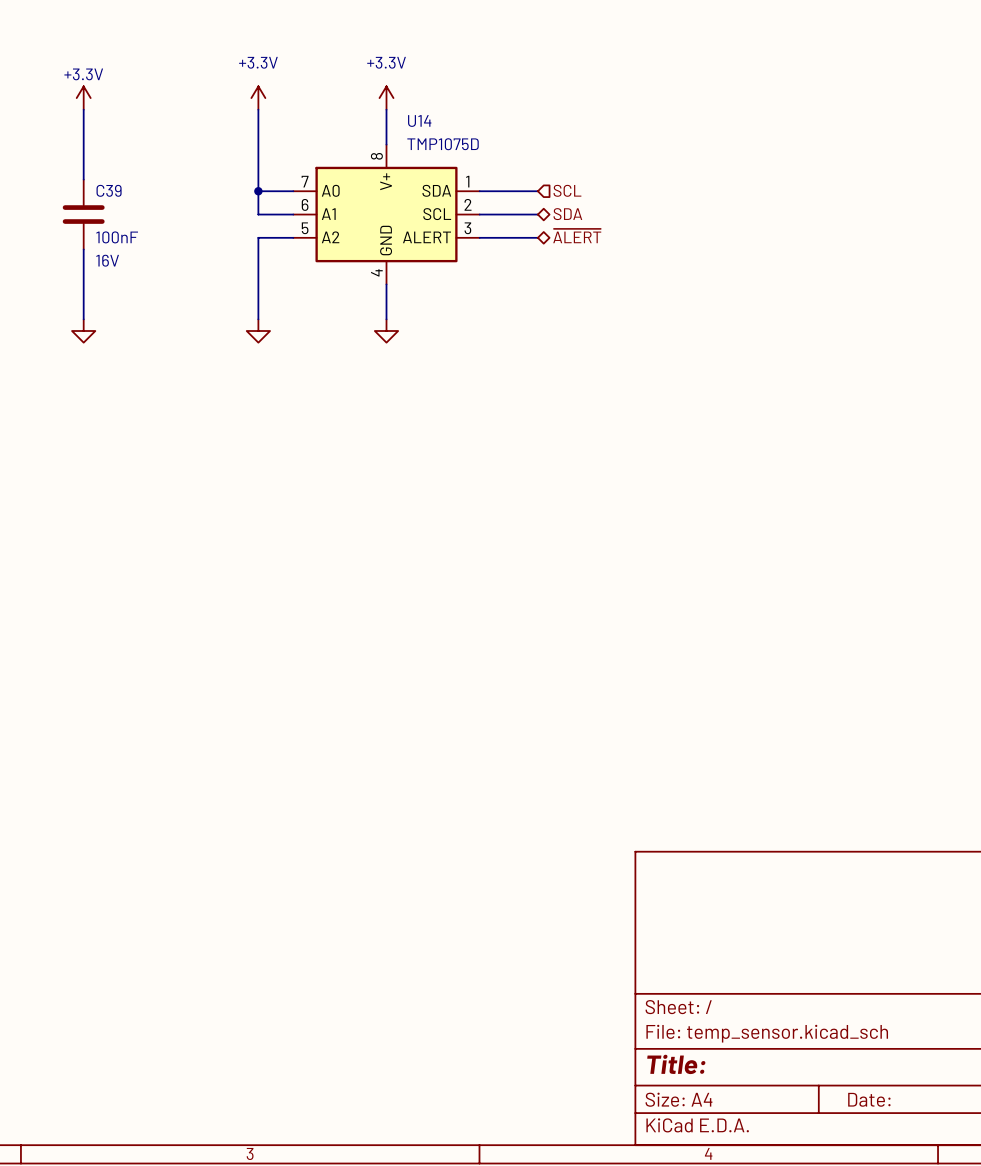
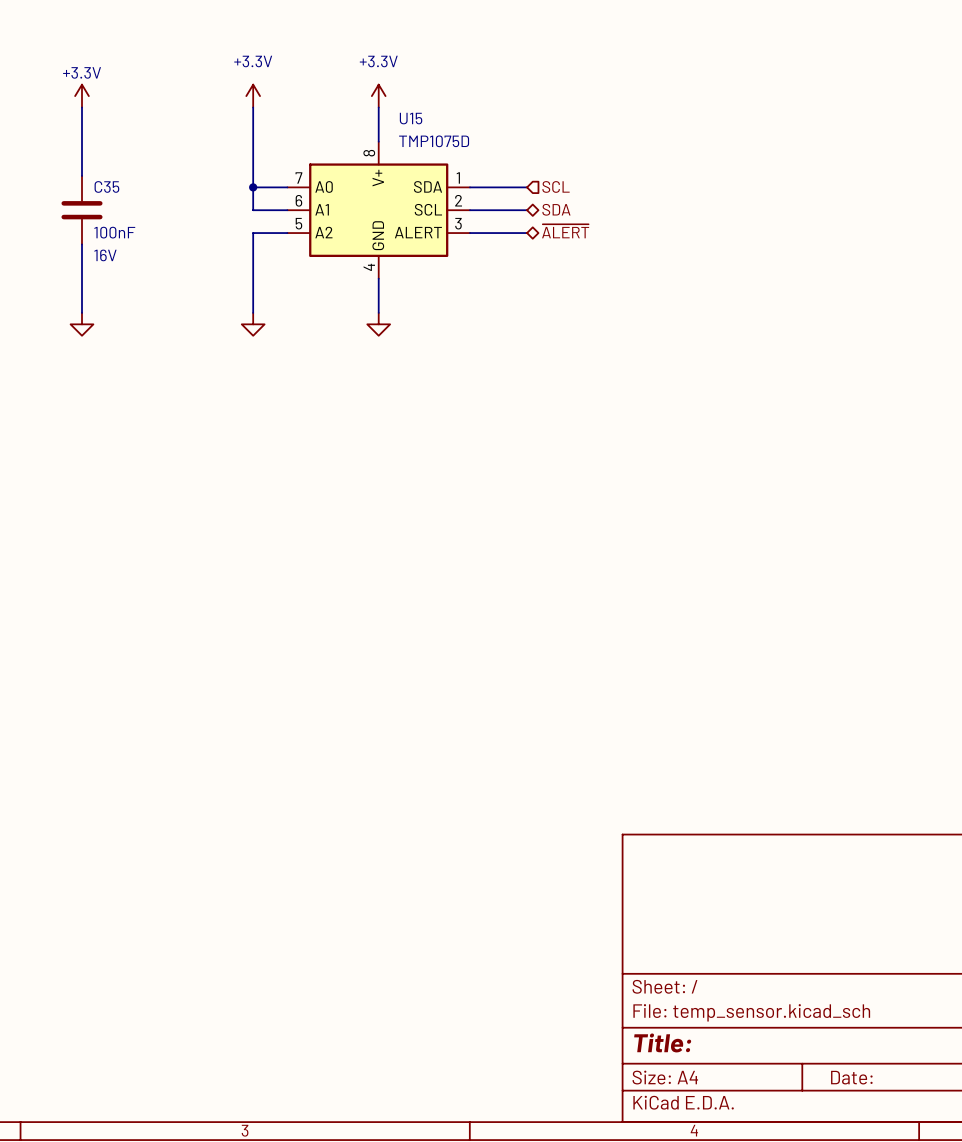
U14 name: U14 (419, 120) -> U15 (411, 118)
C39 name: C39 (109, 190) -> C35 (106, 186)

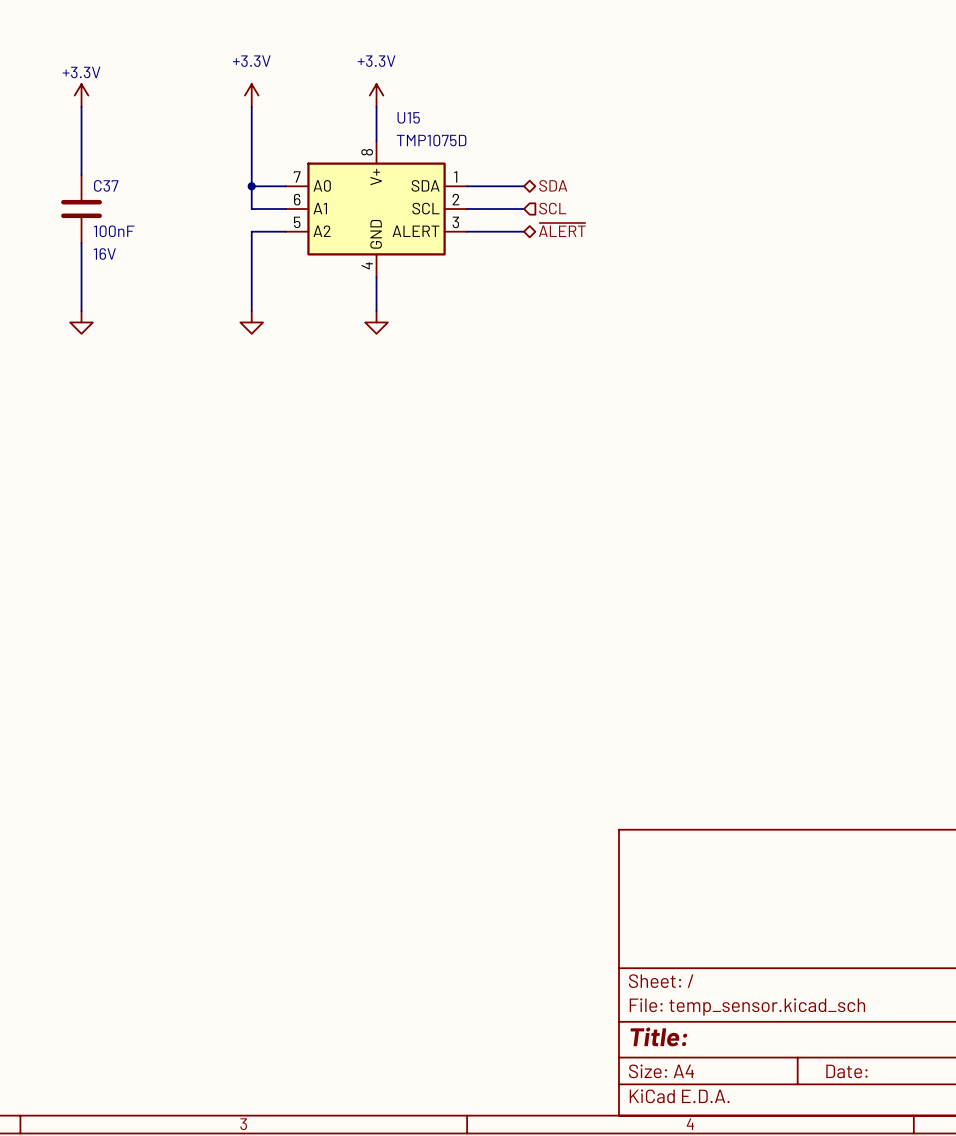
C35 name: C35 (106, 186) -> C37 (106, 185)
hierarchical label shape: input (556, 186) -> bidirectional (553, 185)
hierarchical label: SCL (556, 186) -> SDA (553, 185)
hierarchical label shape: bidirectional (556, 209) -> input (552, 208)
hierarchical label: SDA (556, 209) -> SCL (552, 208)

